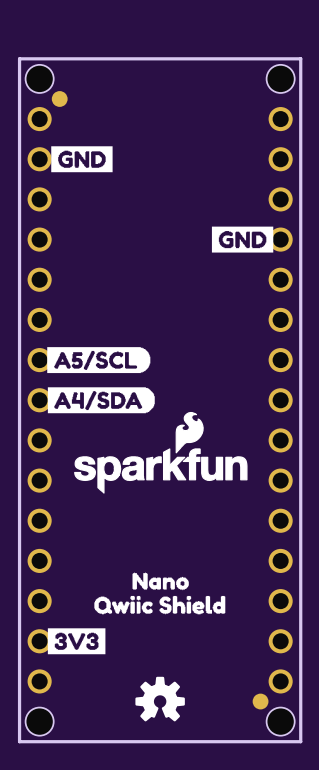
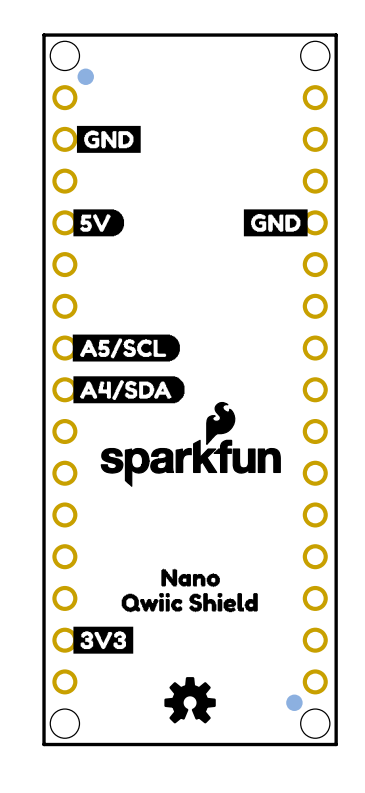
drawing: none -> [73, 209, 125, 237]

